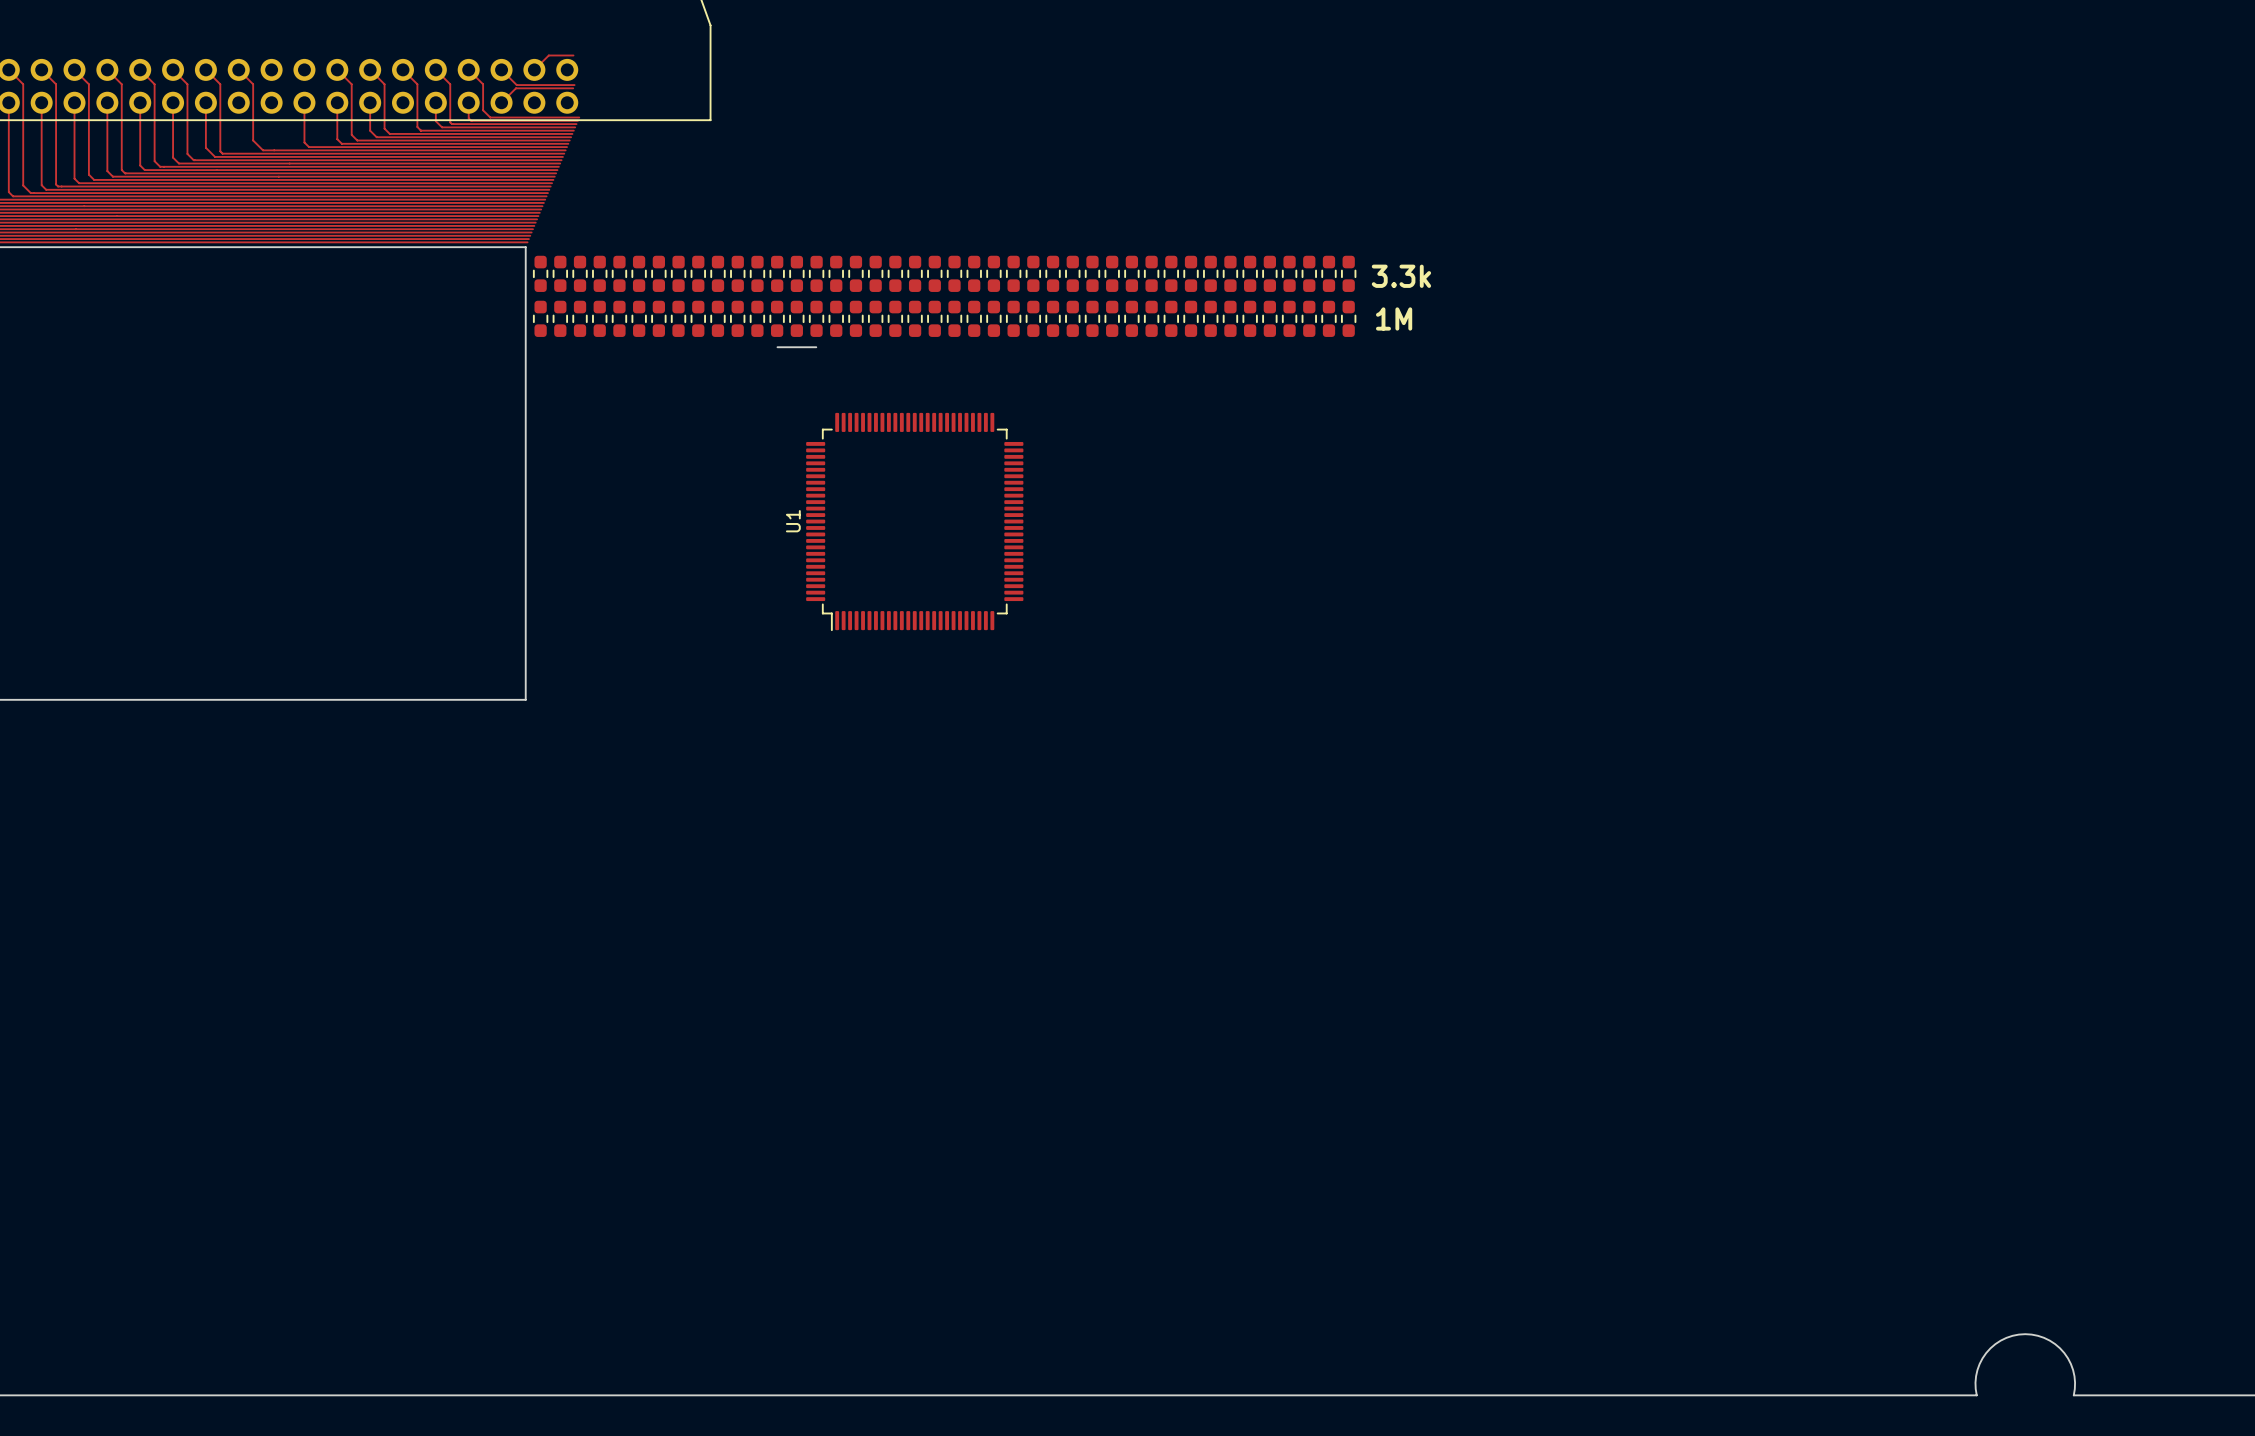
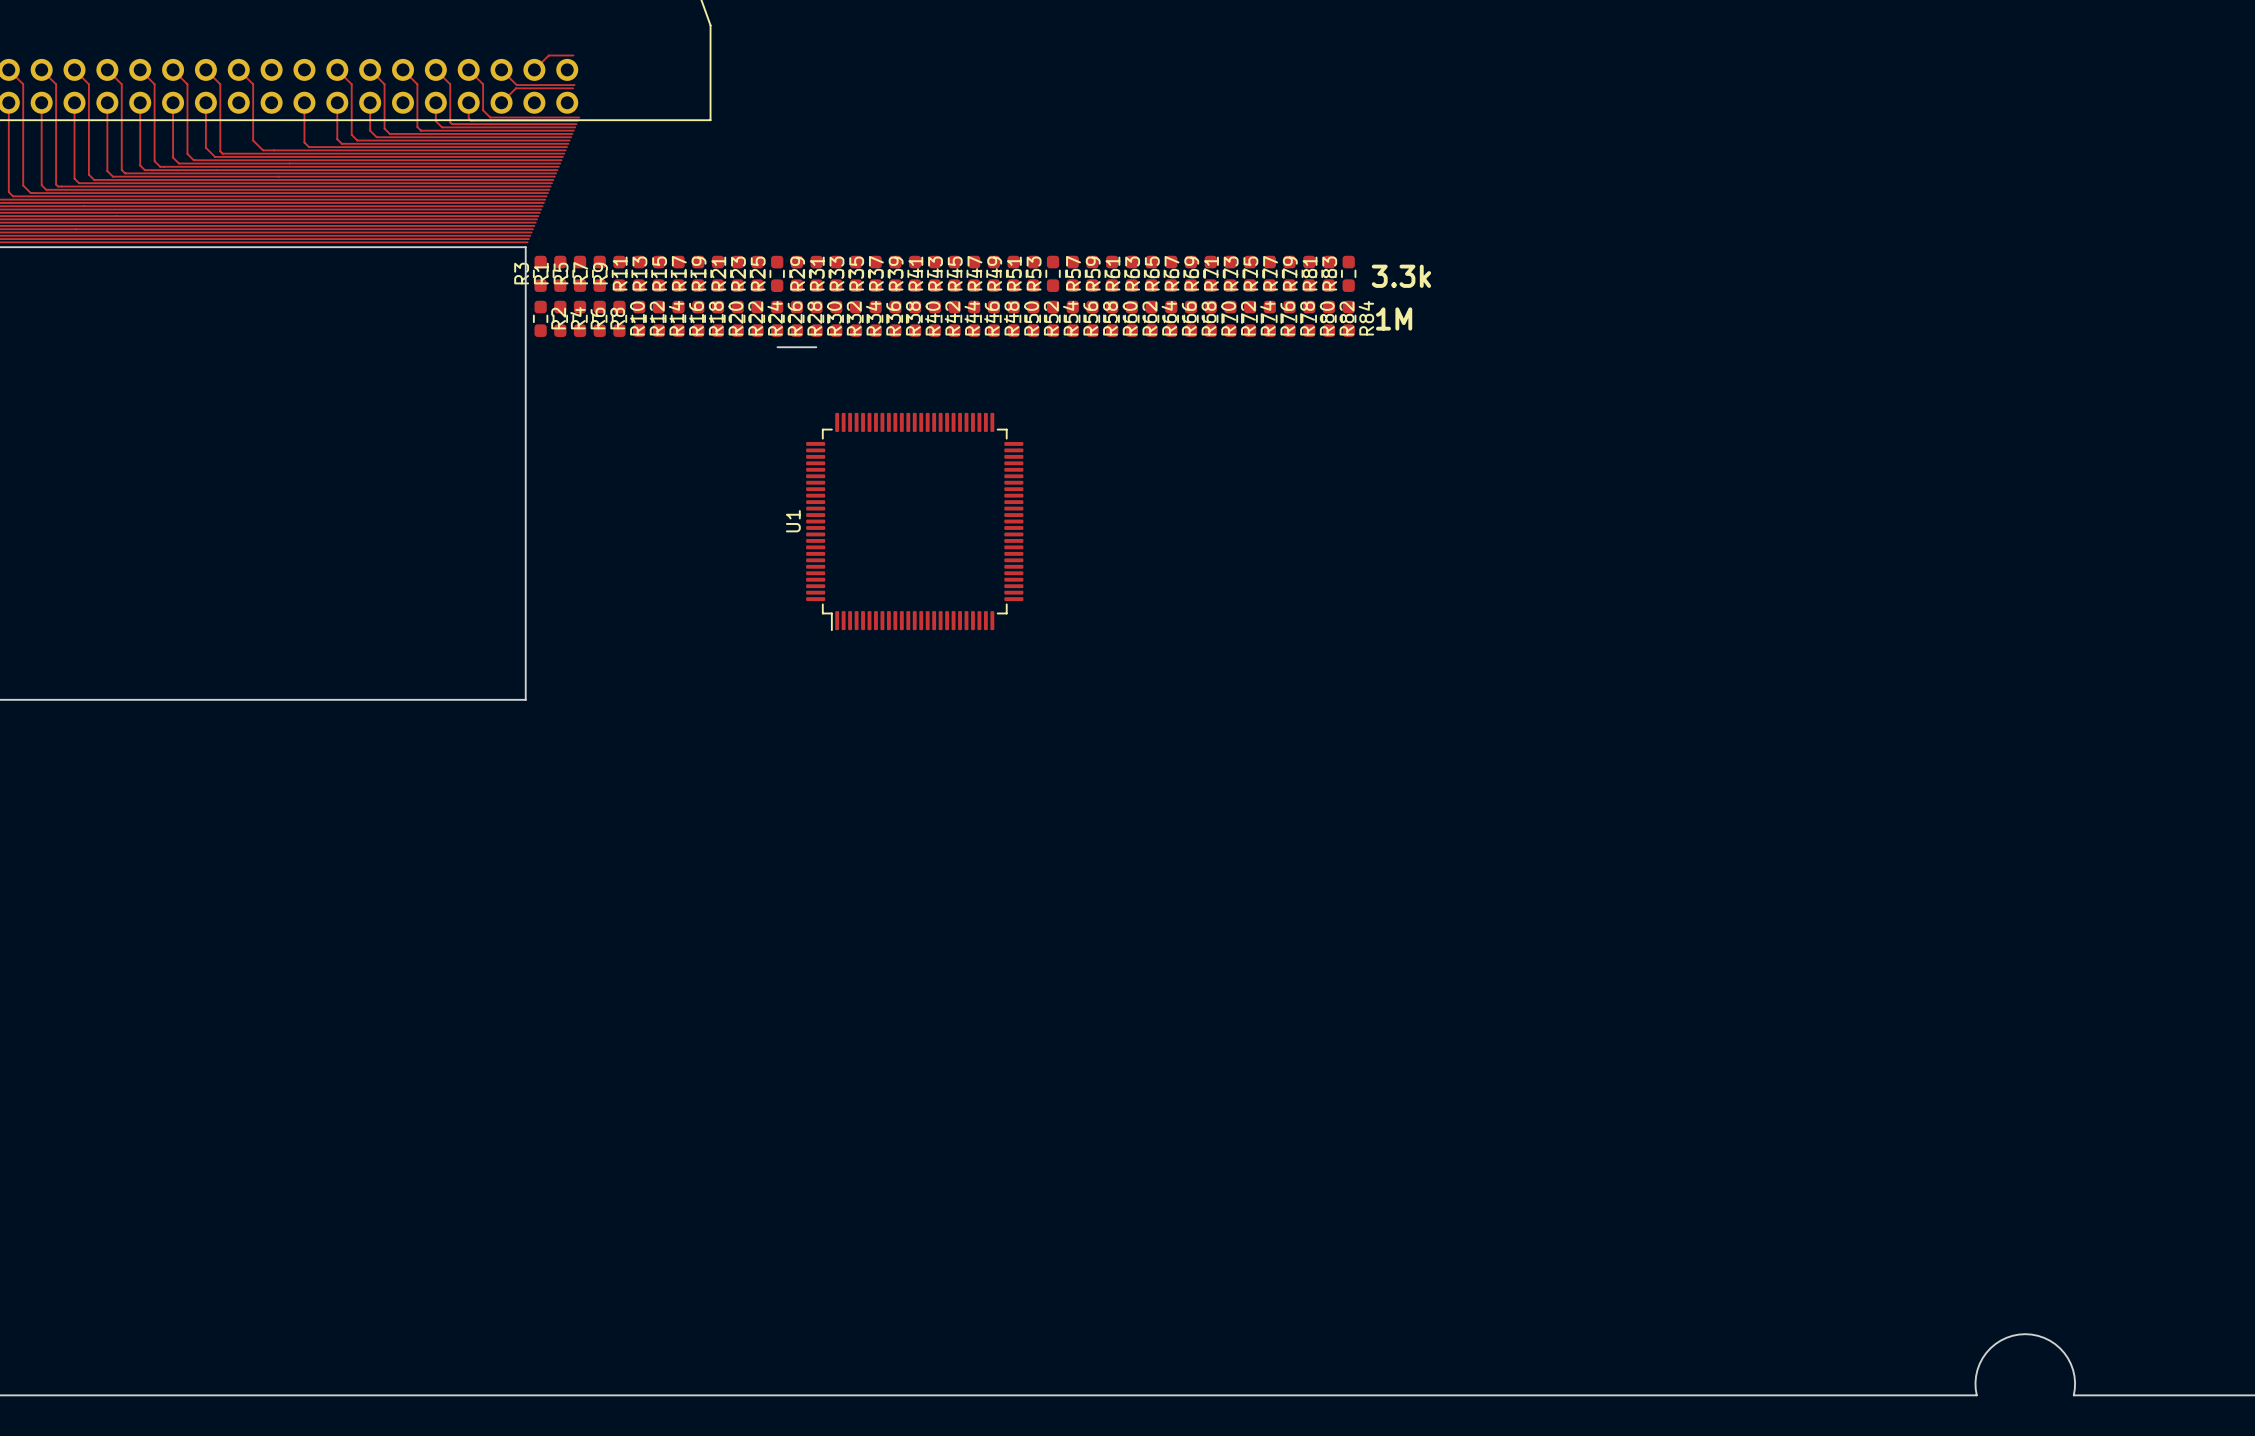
R3 name: none -> R3 (521, 273)
R1 name: none -> R1 (541, 273)
R5 name: none -> R5 (561, 273)
R7 name: none -> R7 (580, 273)
R9 name: none -> R9 (600, 273)
R11 name: none -> R11 (620, 273)
R13 name: none -> R13 (639, 273)
R15 name: none -> R15 (659, 273)
R17 name: none -> R17 (679, 273)
R19 name: none -> R19 (699, 273)
R21 name: none -> R21 (718, 273)
R23 name: none -> R23 (738, 273)
R25 name: none -> R25 (758, 273)
R29 name: none -> R29 (797, 273)
R31 name: none -> R31 (817, 273)
R33 name: none -> R33 (836, 273)
R35 name: none -> R35 (856, 273)
R37 name: none -> R37 (876, 273)
R39 name: none -> R39 (896, 273)
R41 name: none -> R41 (915, 273)
R43 name: none -> R43 (935, 273)
R45 name: none -> R45 (954, 273)
R47 name: none -> R47 (974, 273)
R49 name: none -> R49 (994, 273)
R51 name: none -> R51 (1014, 273)
R53 name: none -> R53 (1034, 273)
R57 name: none -> R57 (1073, 273)
R59 name: none -> R59 (1093, 273)
R61 name: none -> R61 (1112, 273)
R63 name: none -> R63 (1132, 273)
R65 name: none -> R65 (1152, 273)
R67 name: none -> R67 (1172, 273)
R69 name: none -> R69 (1191, 273)
R71 name: none -> R71 (1211, 273)
R73 name: none -> R73 (1231, 273)
R75 name: none -> R75 (1250, 273)
R77 name: none -> R77 (1270, 273)
R79 name: none -> R79 (1290, 273)
R81 name: none -> R81 (1310, 273)
R83 name: none -> R83 (1329, 273)
R2 name: none -> R2 (558, 318)
R4 name: none -> R4 (578, 318)
R6 name: none -> R6 (598, 318)
R8 name: none -> R8 (617, 318)
R10 name: none -> R10 (637, 318)
R12 name: none -> R12 (657, 318)
R14 name: none -> R14 (676, 318)
R16 name: none -> R16 (696, 318)
R18 name: none -> R18 (716, 318)
R20 name: none -> R20 (735, 318)
R22 name: none -> R22 (755, 318)
R24 name: none -> R24 (775, 318)
R26 name: none -> R26 (795, 318)
R28 name: none -> R28 (814, 318)
R30 name: none -> R30 (834, 318)
R32 name: none -> R32 (854, 318)
R34 name: none -> R34 (873, 318)
R36 name: none -> R36 (893, 318)
R38 name: none -> R38 (913, 318)
R40 name: none -> R40 (932, 318)
R42 name: none -> R42 (952, 318)
R44 name: none -> R44 (972, 318)
R46 name: none -> R46 (991, 318)
R48 name: none -> R48 (1011, 318)
R50 name: none -> R50 (1031, 318)
R52 name: none -> R52 (1051, 318)
R54 name: none -> R54 (1070, 318)
R56 name: none -> R56 (1090, 318)
R58 name: none -> R58 (1110, 318)
R60 name: none -> R60 (1130, 318)
R62 name: none -> R62 (1149, 318)
R64 name: none -> R64 (1169, 318)
R66 name: none -> R66 (1189, 318)
R68 name: none -> R68 (1209, 318)
R70 name: none -> R70 (1228, 318)
R72 name: none -> R72 (1248, 318)
R74 name: none -> R74 (1267, 318)
R76 name: none -> R76 (1287, 318)
R78 name: none -> R78 (1307, 318)
R80 name: none -> R80 (1327, 318)
R82 name: none -> R82 (1346, 318)
R84 name: none -> R84 (1366, 318)

